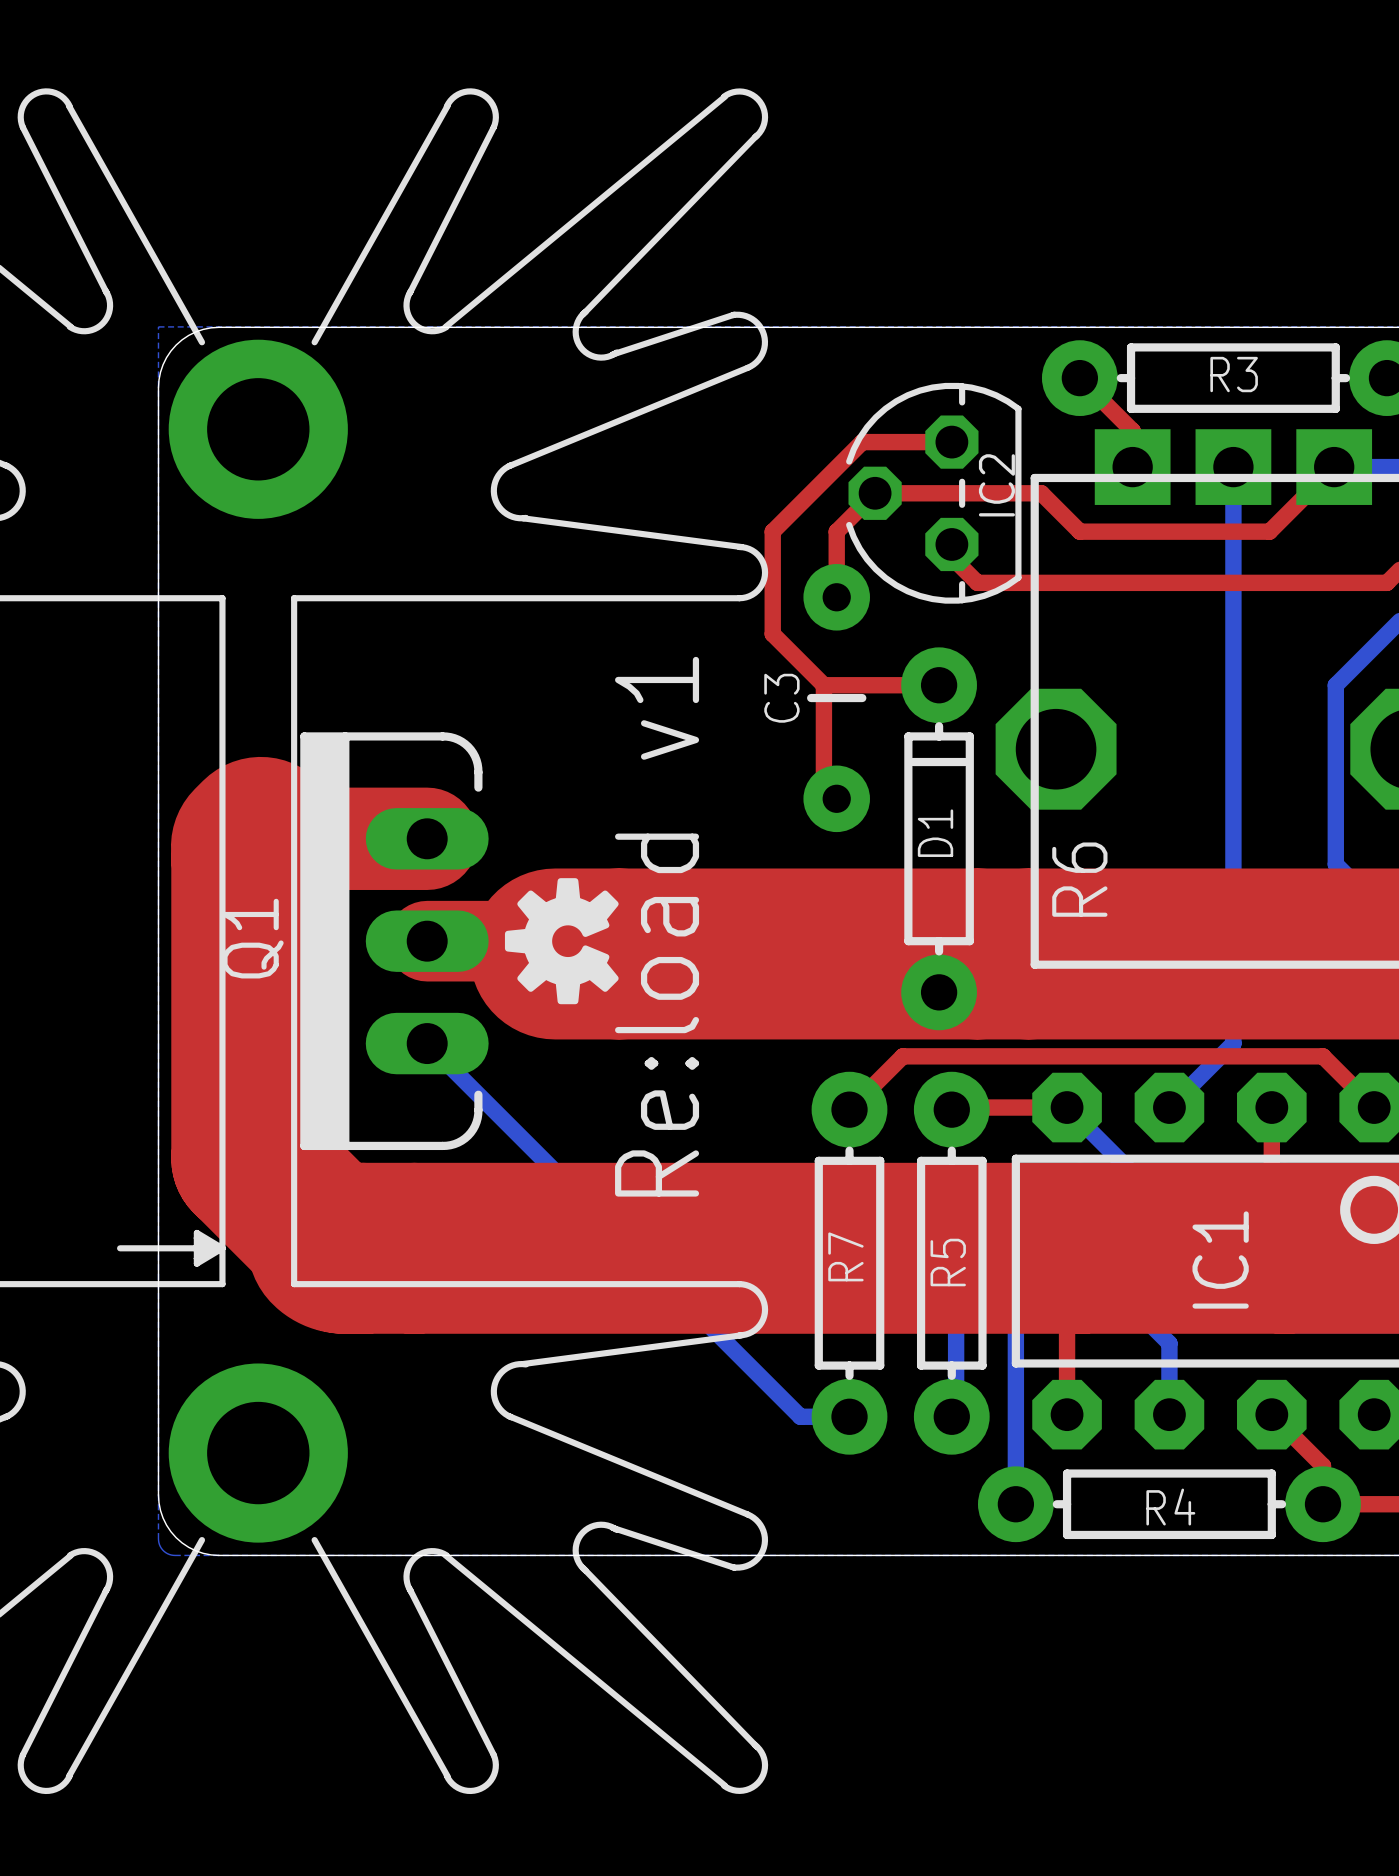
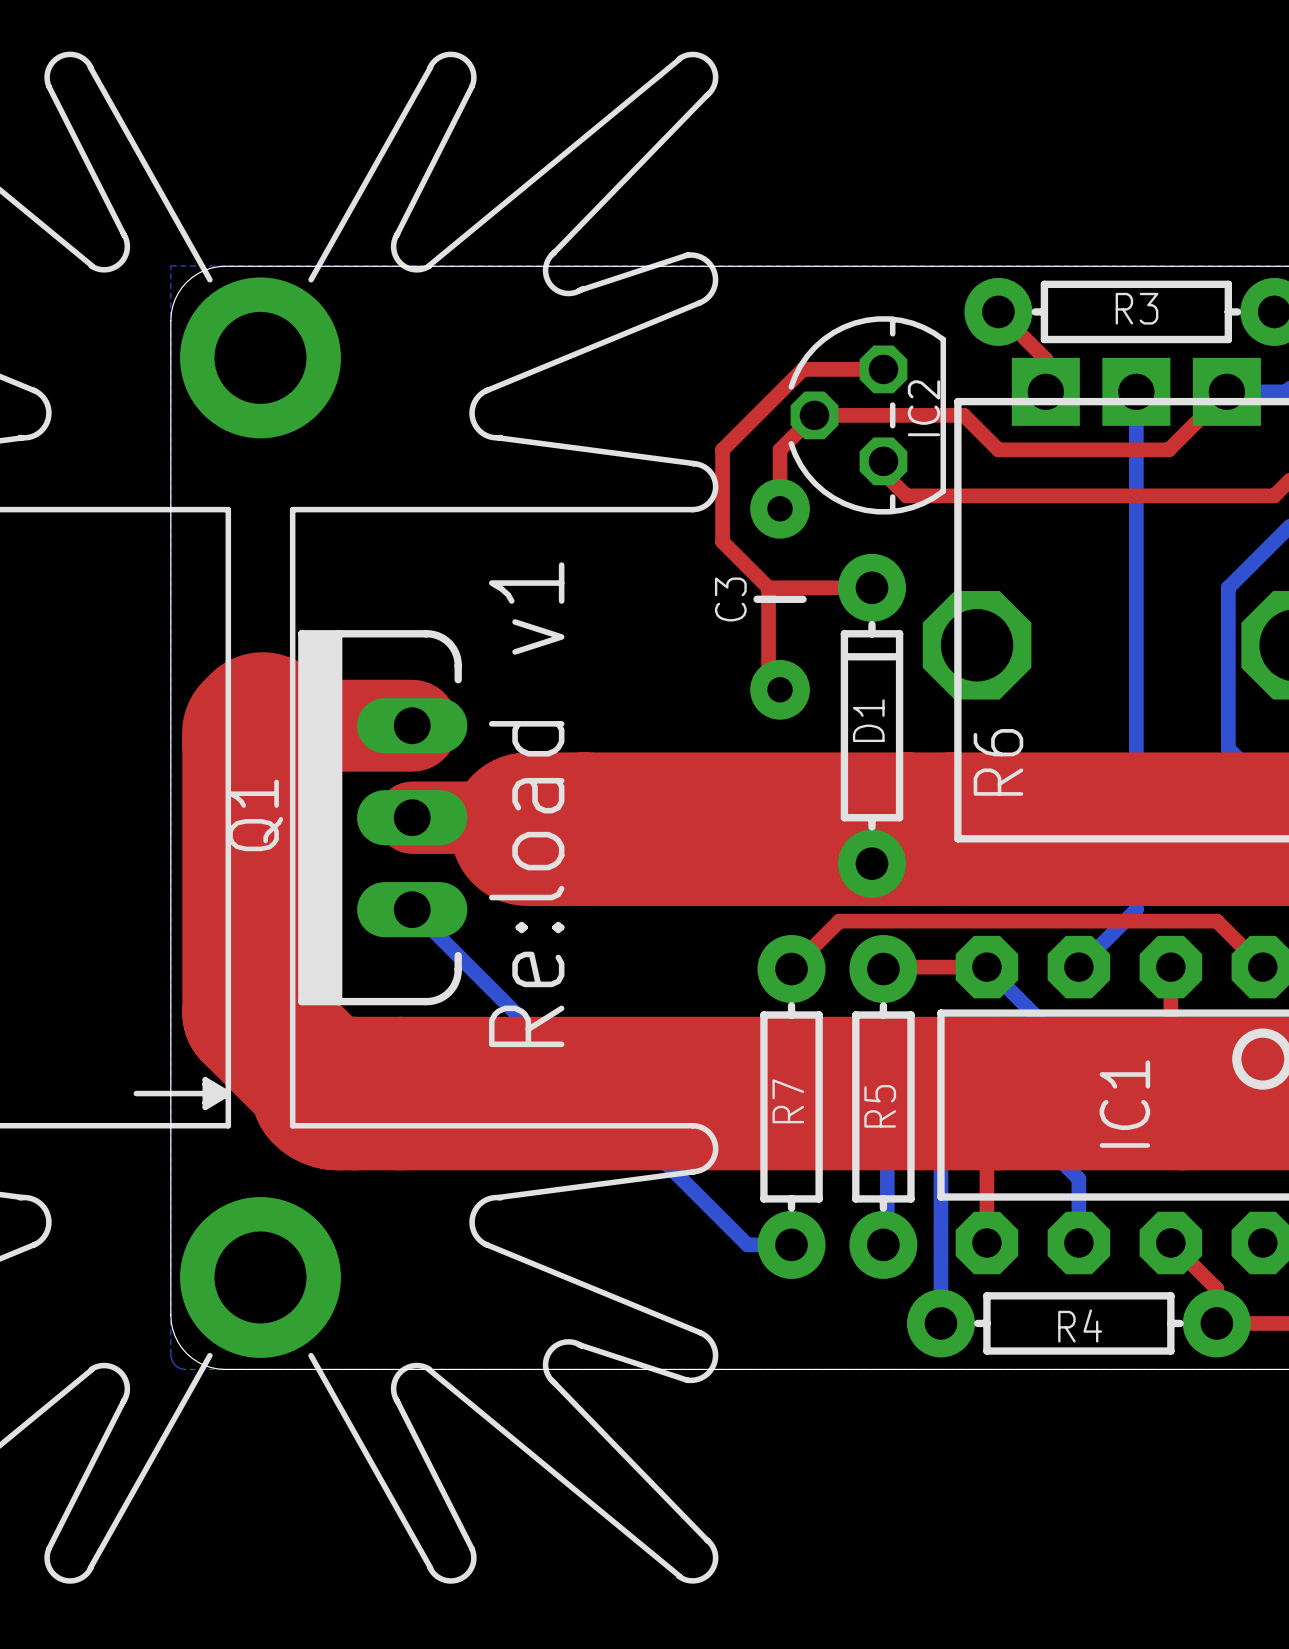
drawing: [504, 878, 619, 1005] -> none
text position: Re:load v1 (657, 926) -> Re:load v1 (526, 804)

